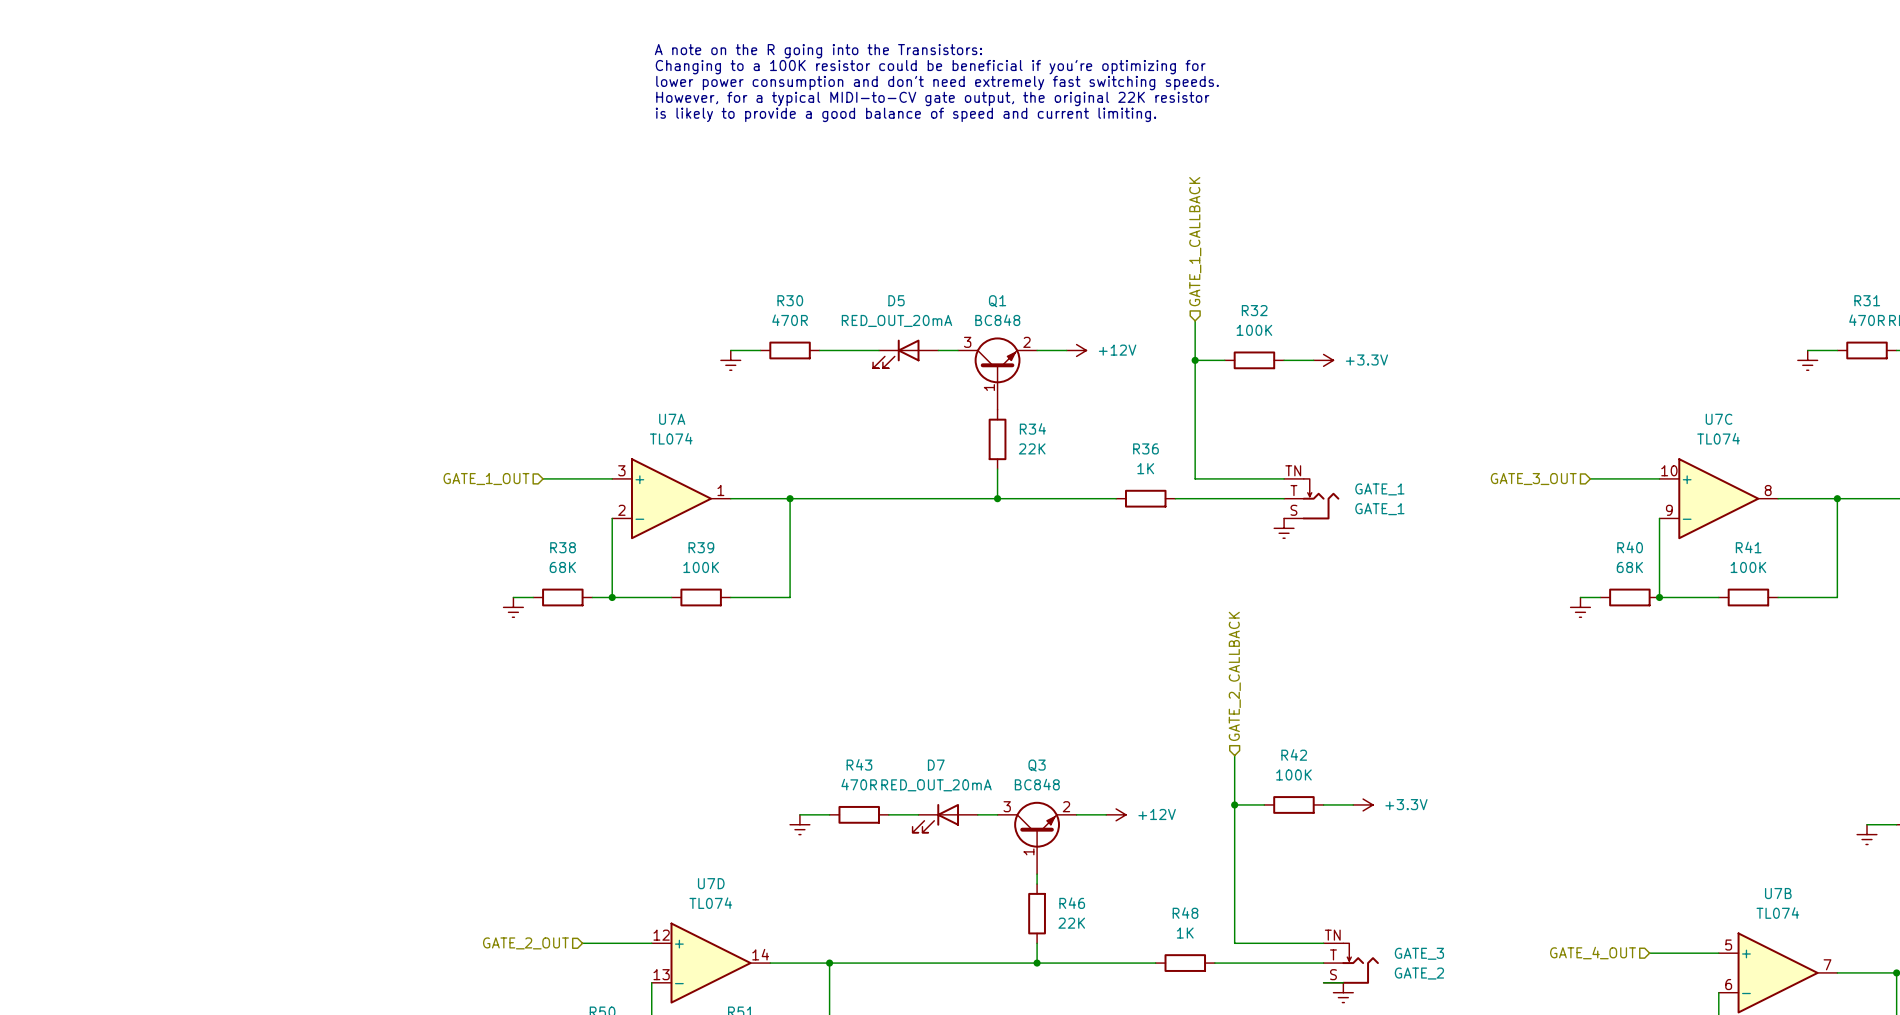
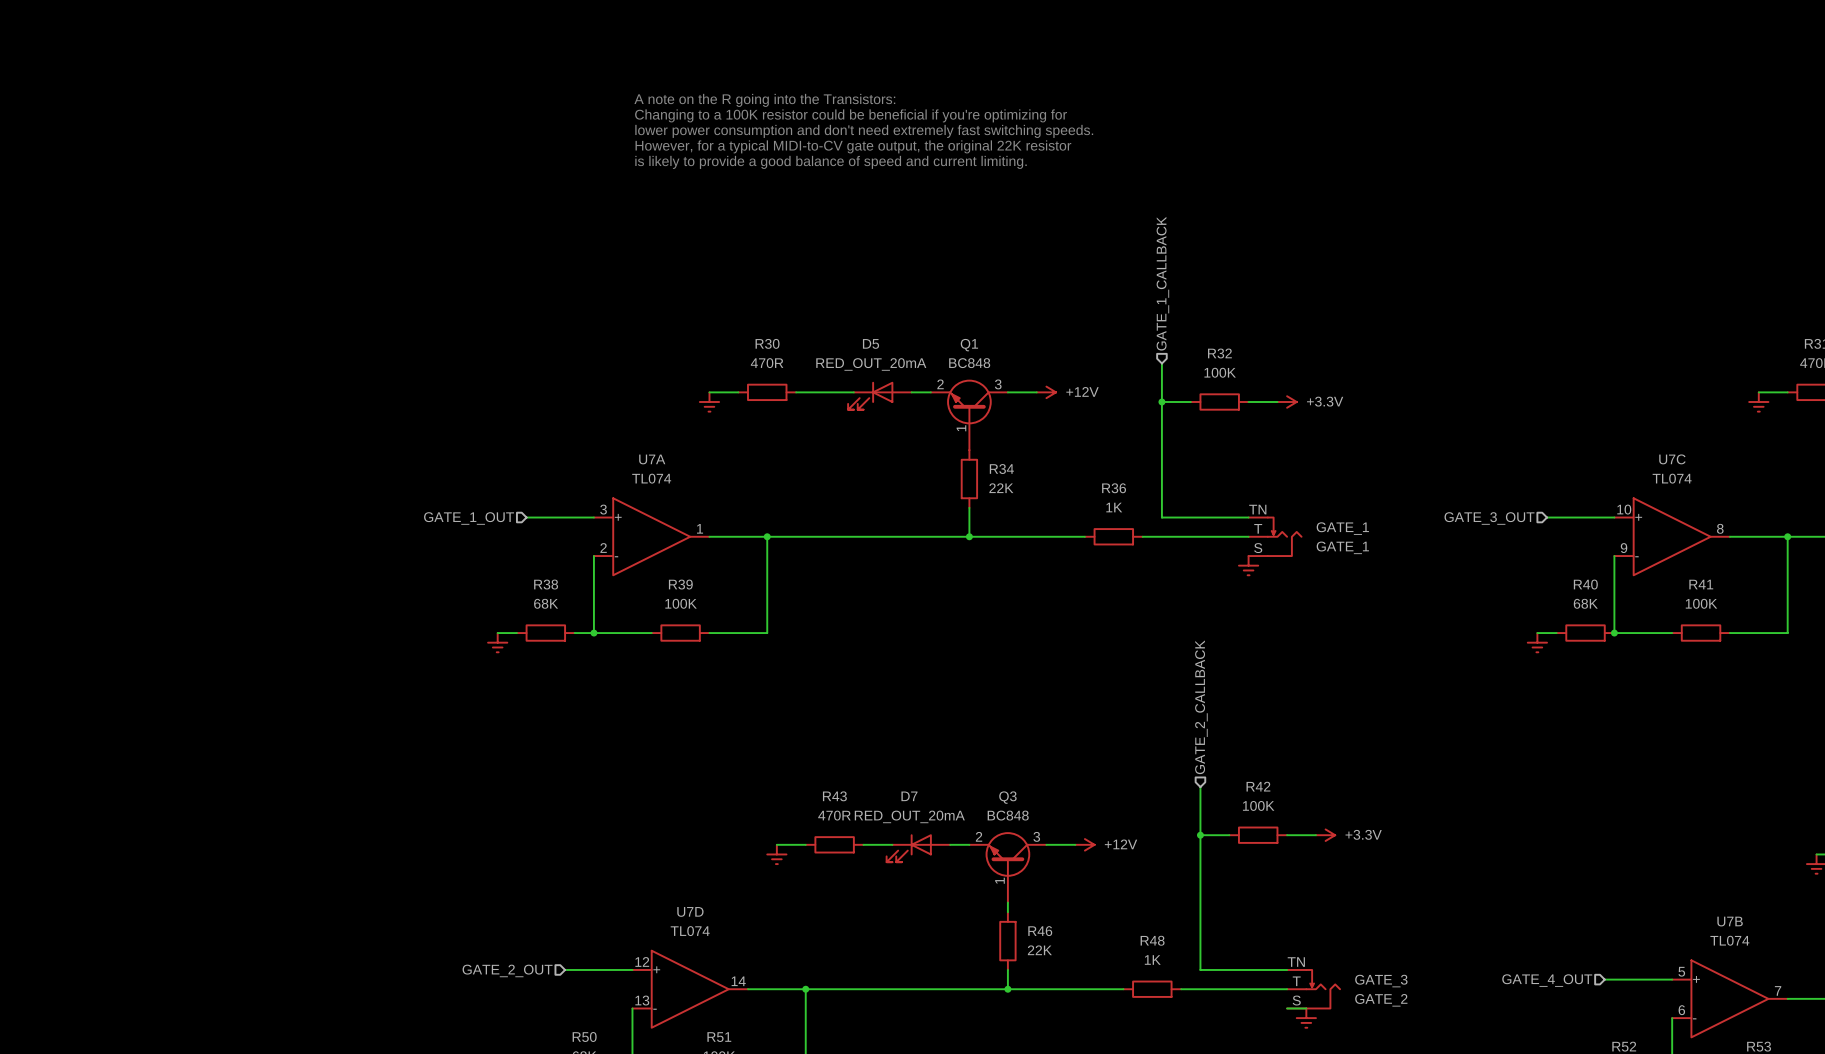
Q1 flip: as is (997, 360) -> left-right (969, 401)
Q3 flip: as is (1037, 824) -> left-right (1007, 854)

